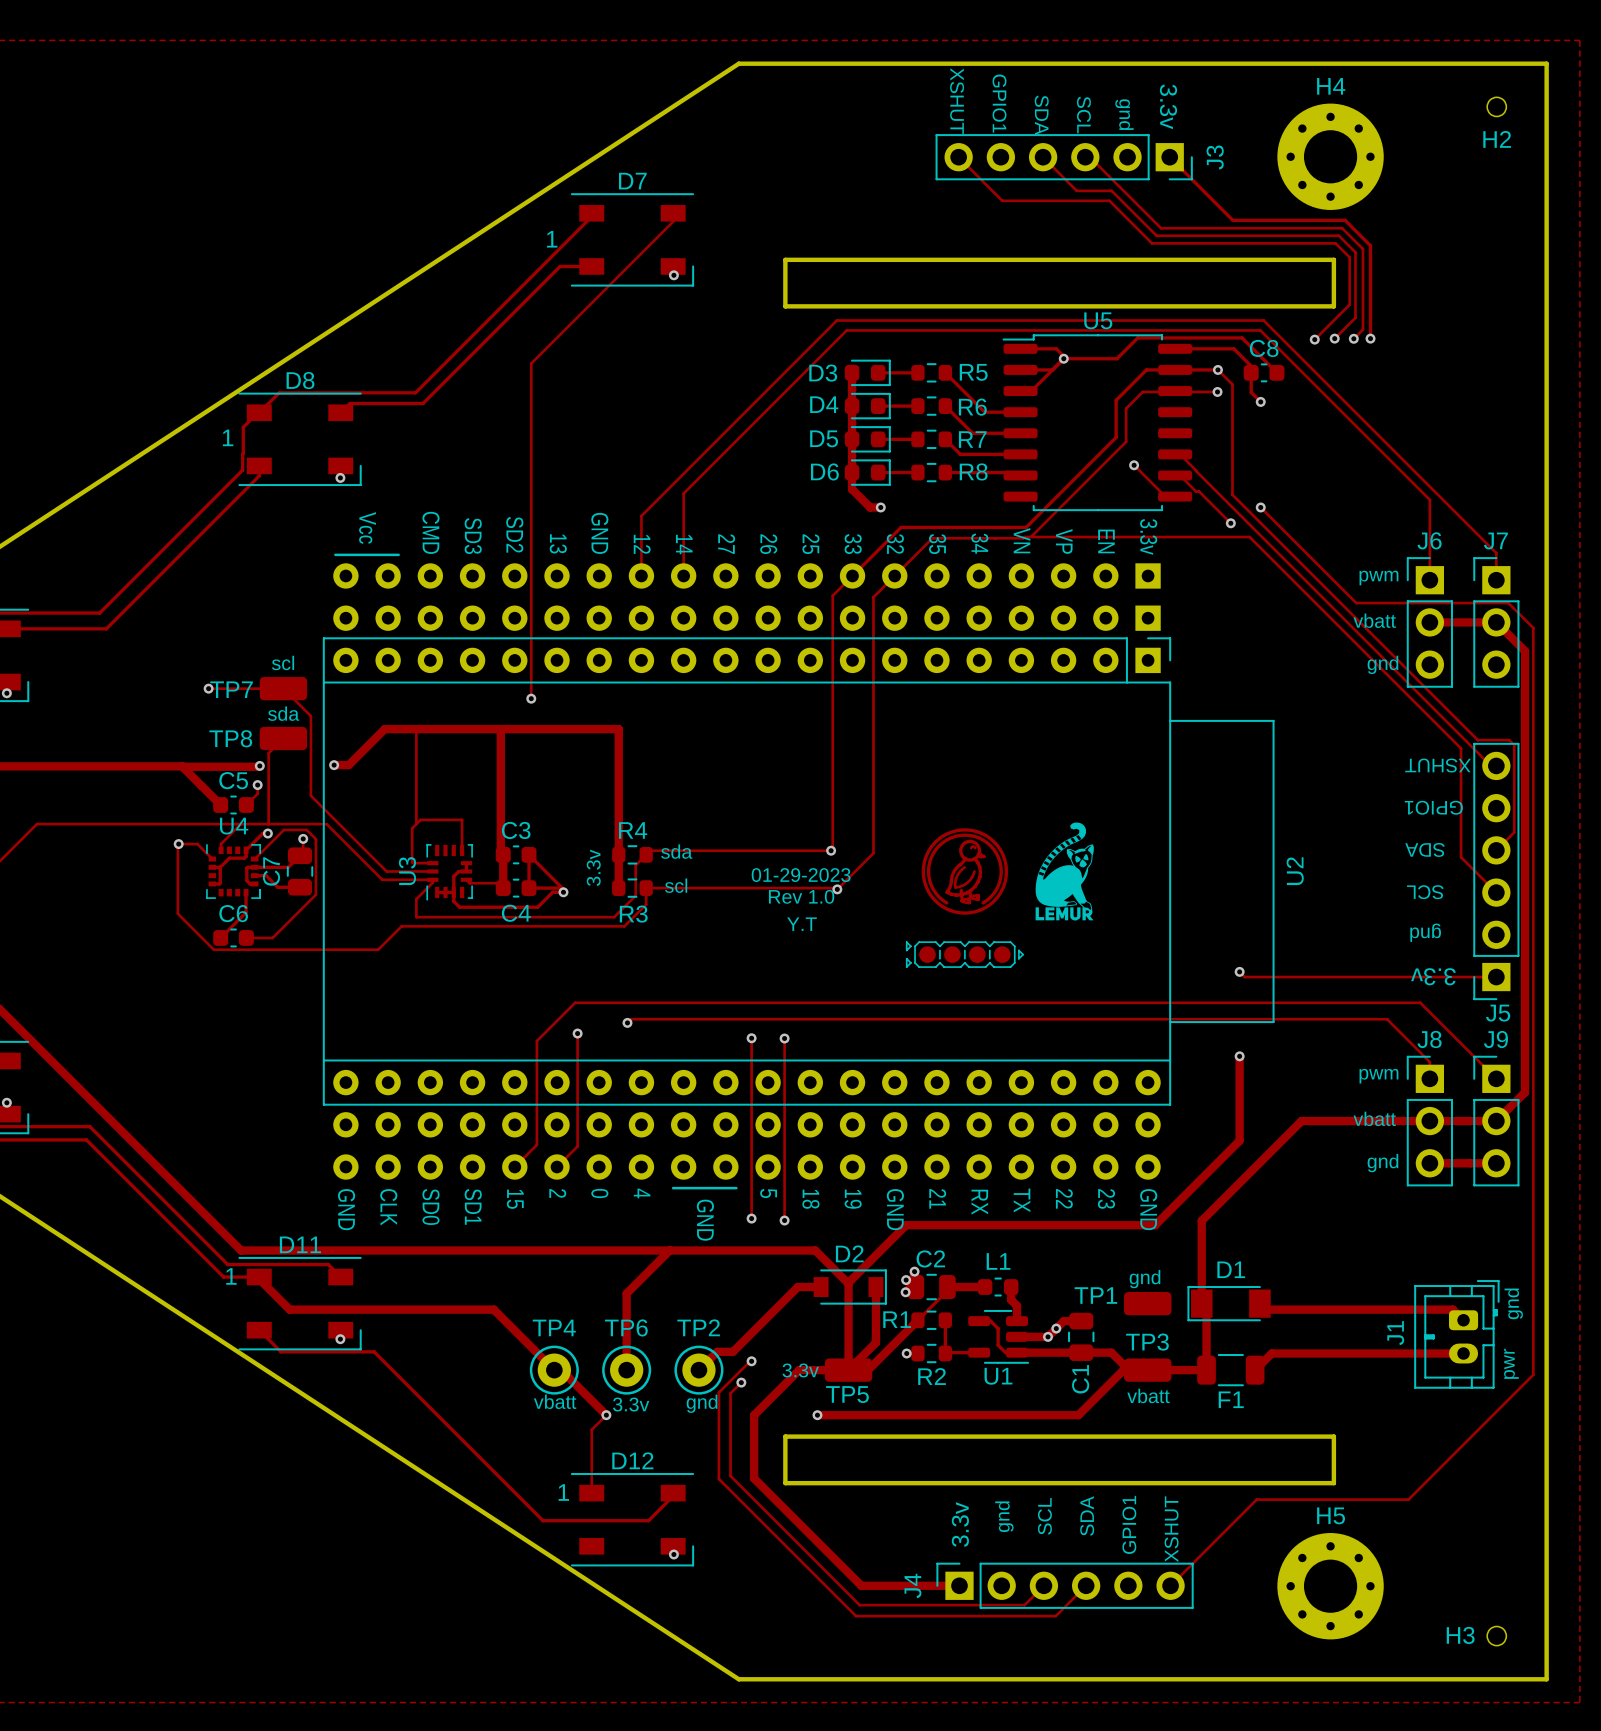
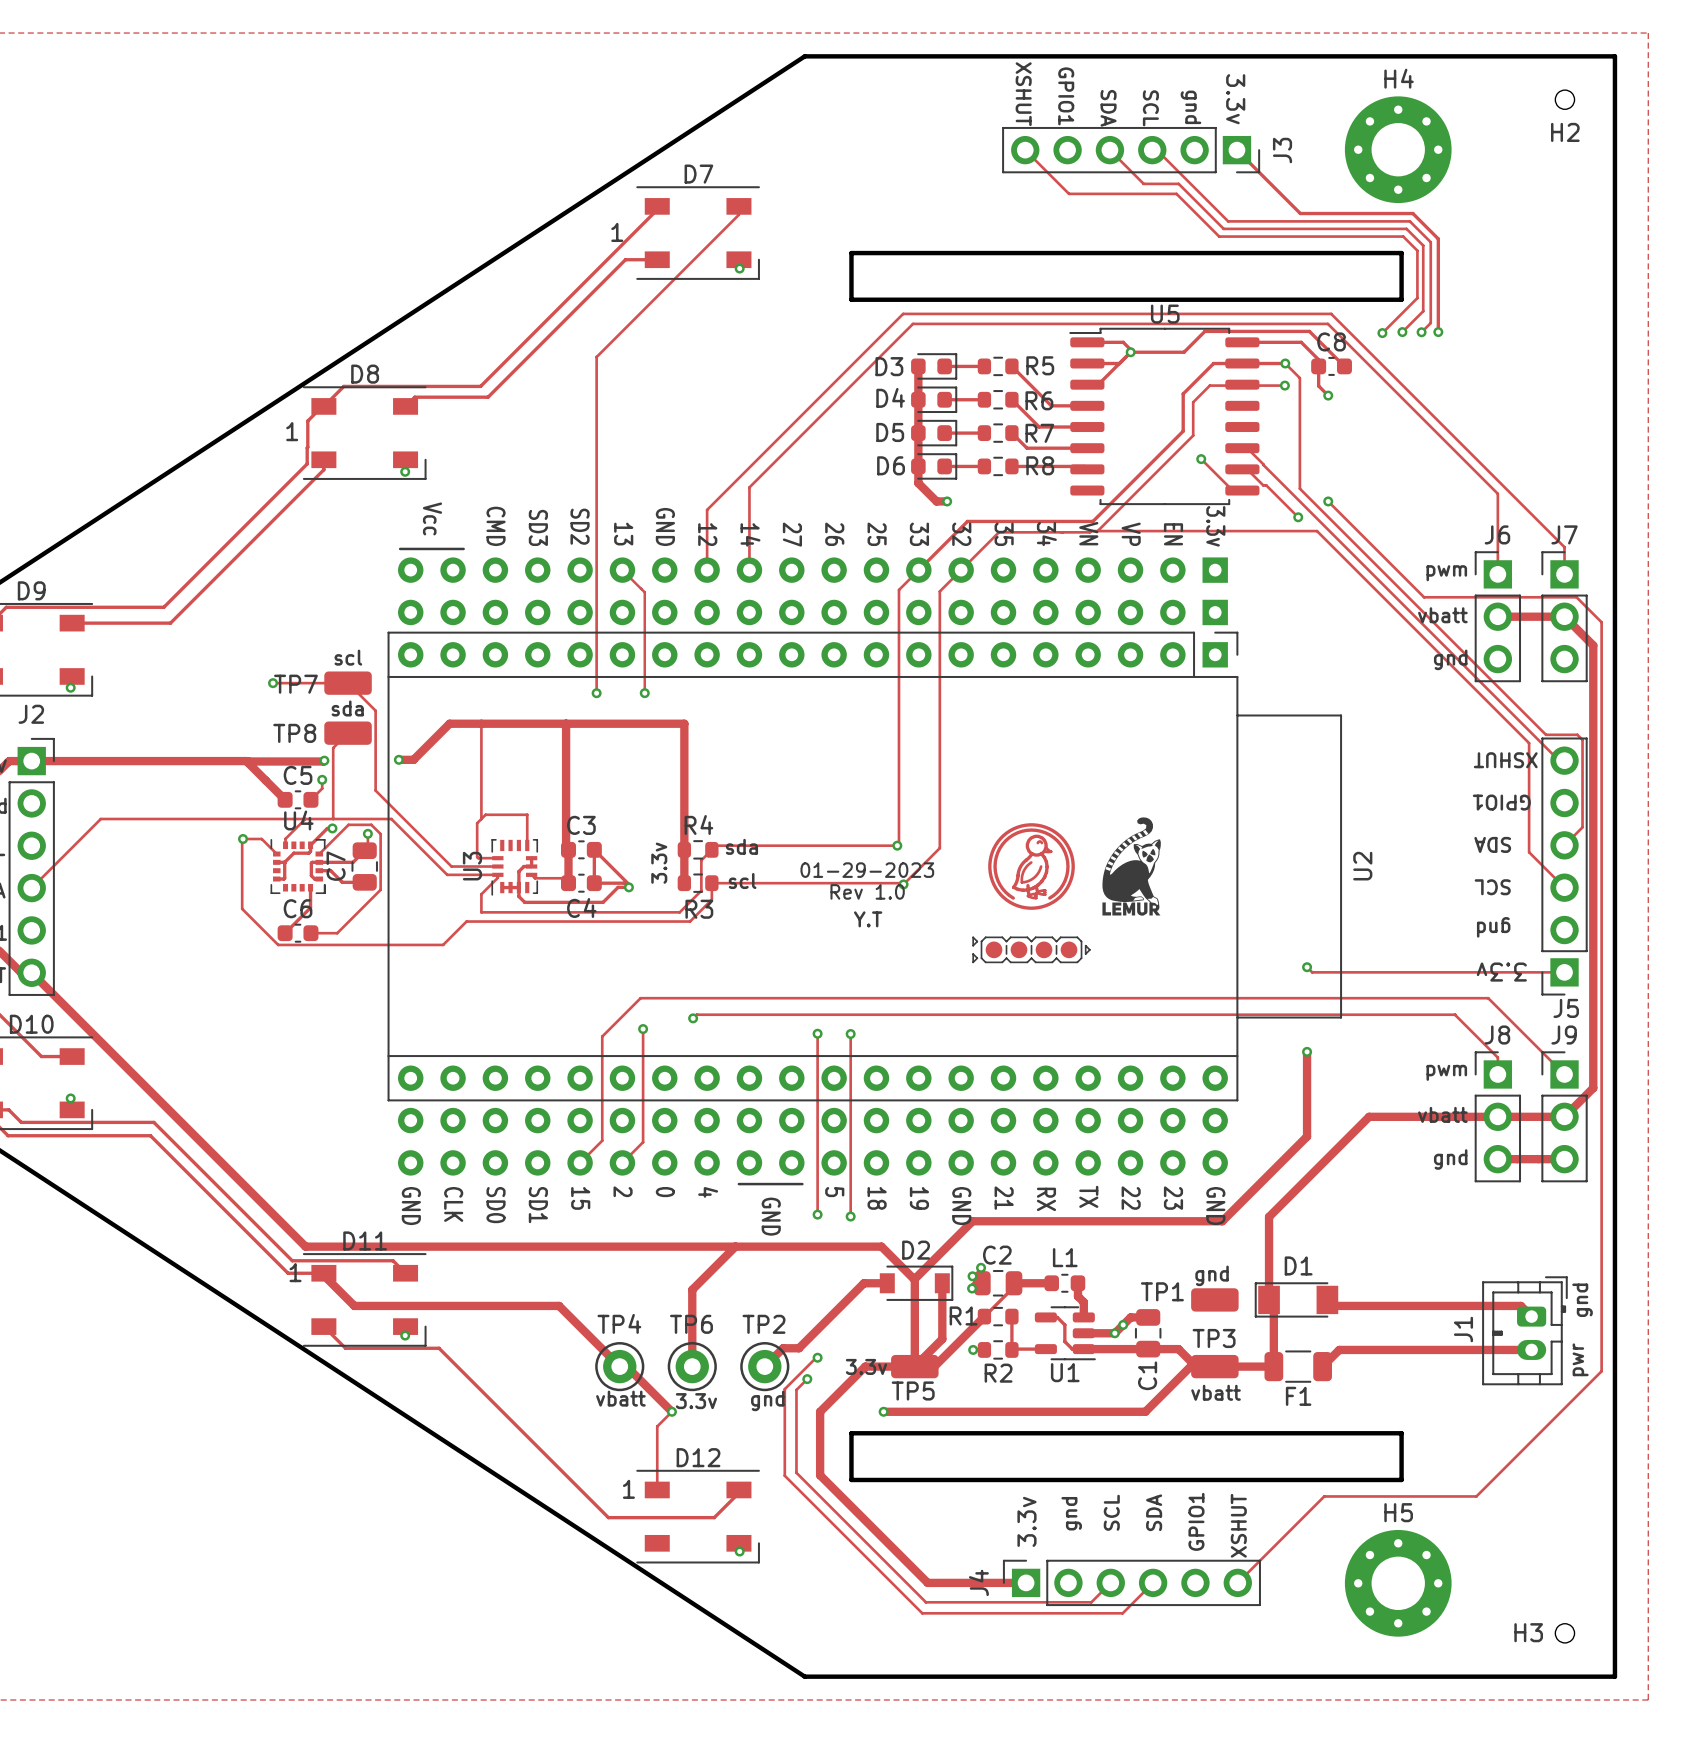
track: none -> (622, 570) (641, 588)
track: none -> (641, 588) (644, 592) (644, 693)
via: none -> (644, 693)

